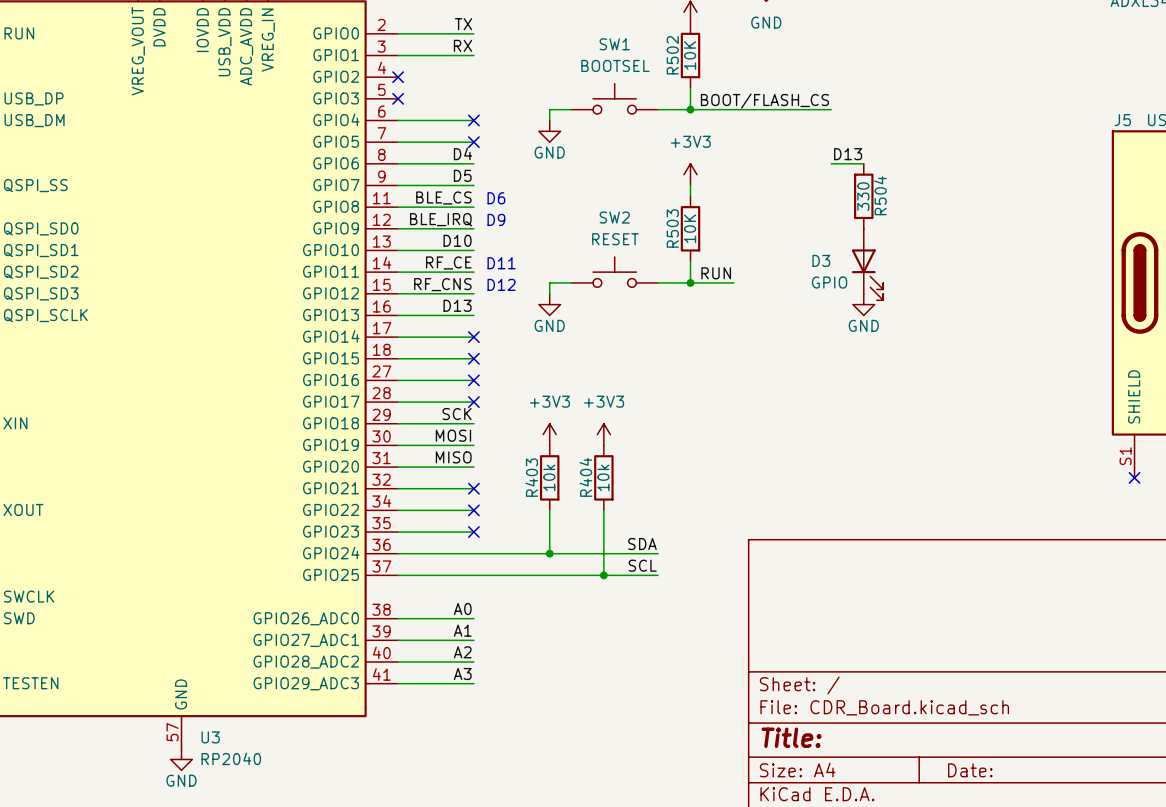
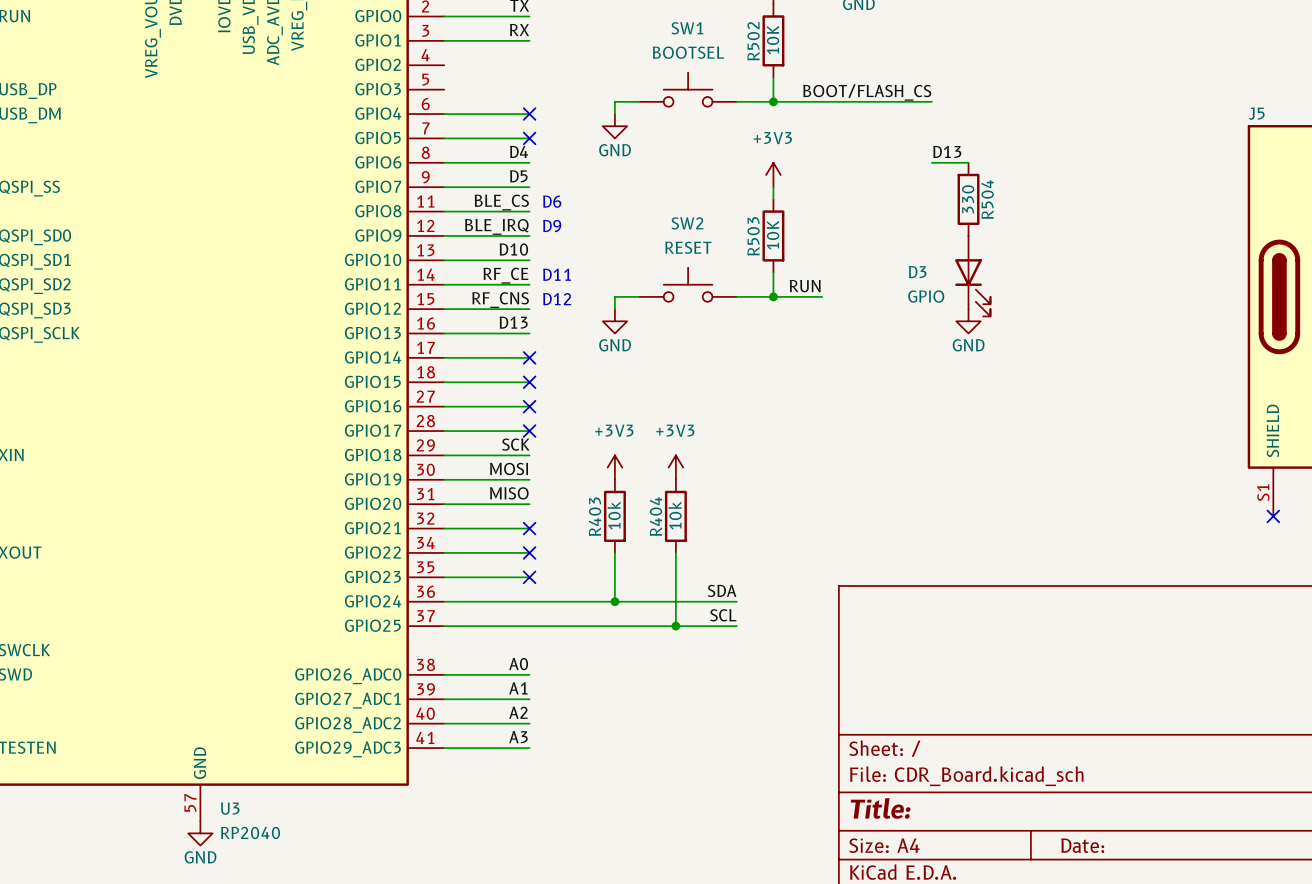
no-connect mark: (398, 77) -> none
no-connect mark: (398, 98) -> none

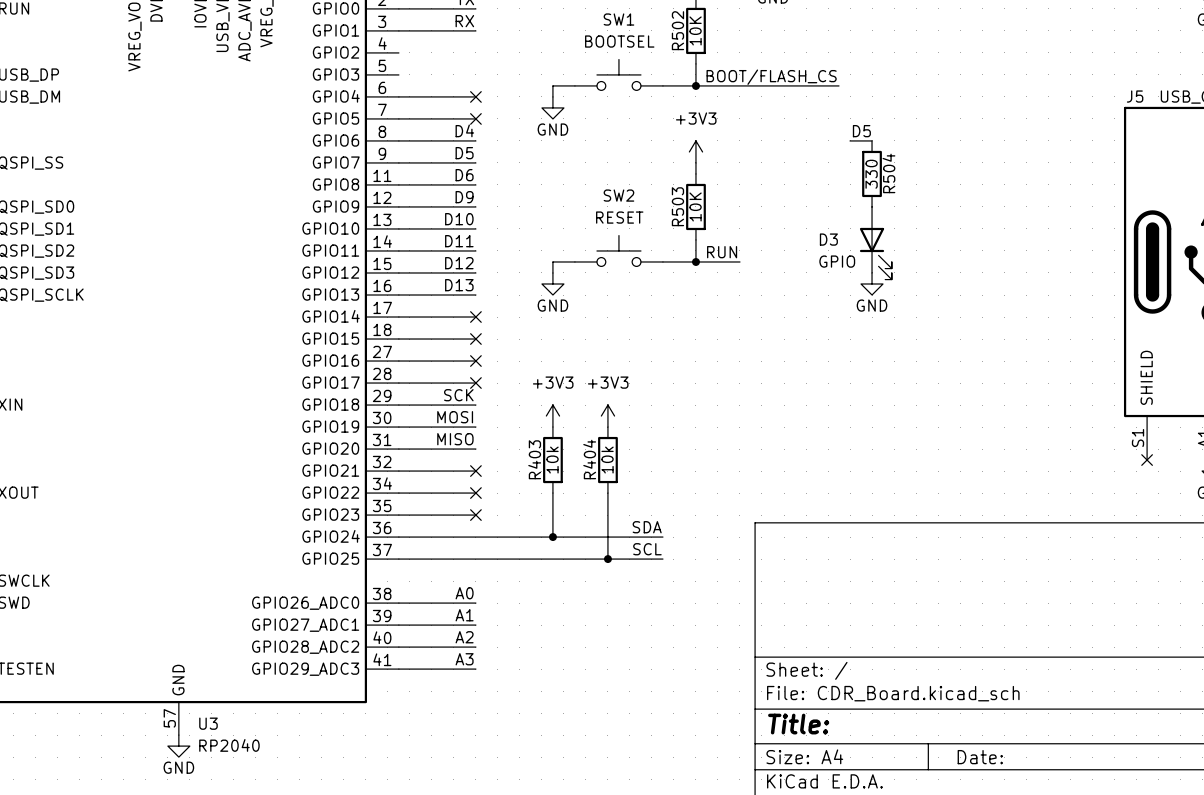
label: D13 (947, 151) -> none
label: none -> D5 (861, 131)
wire: (931, 162) (944, 162) -> none
text: D6 (552, 201) -> none
label: BLE_CS (501, 202) -> D6 (464, 175)
label: BLE_IRQ (496, 226) -> D9 (464, 197)
text: D9 (552, 226) -> none
text: D11 (557, 274) -> none
label: RF_CE (505, 275) -> D11 (459, 241)
text: D12 (557, 299) -> none
label: RF_CNS (500, 300) -> D12 (459, 263)

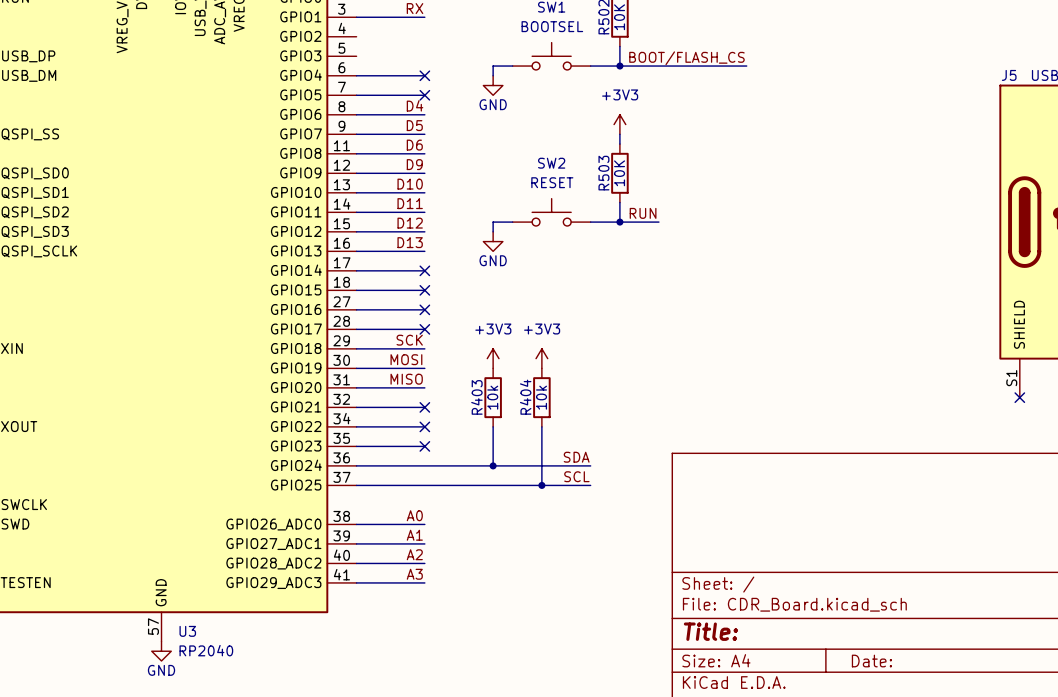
label: D5 (861, 131) -> none
wire: (850, 140) (872, 140) -> none
R504: 330 (872, 173) -> none
D3: GPIO (875, 243) -> none
power symbol: GND (872, 283) -> none

